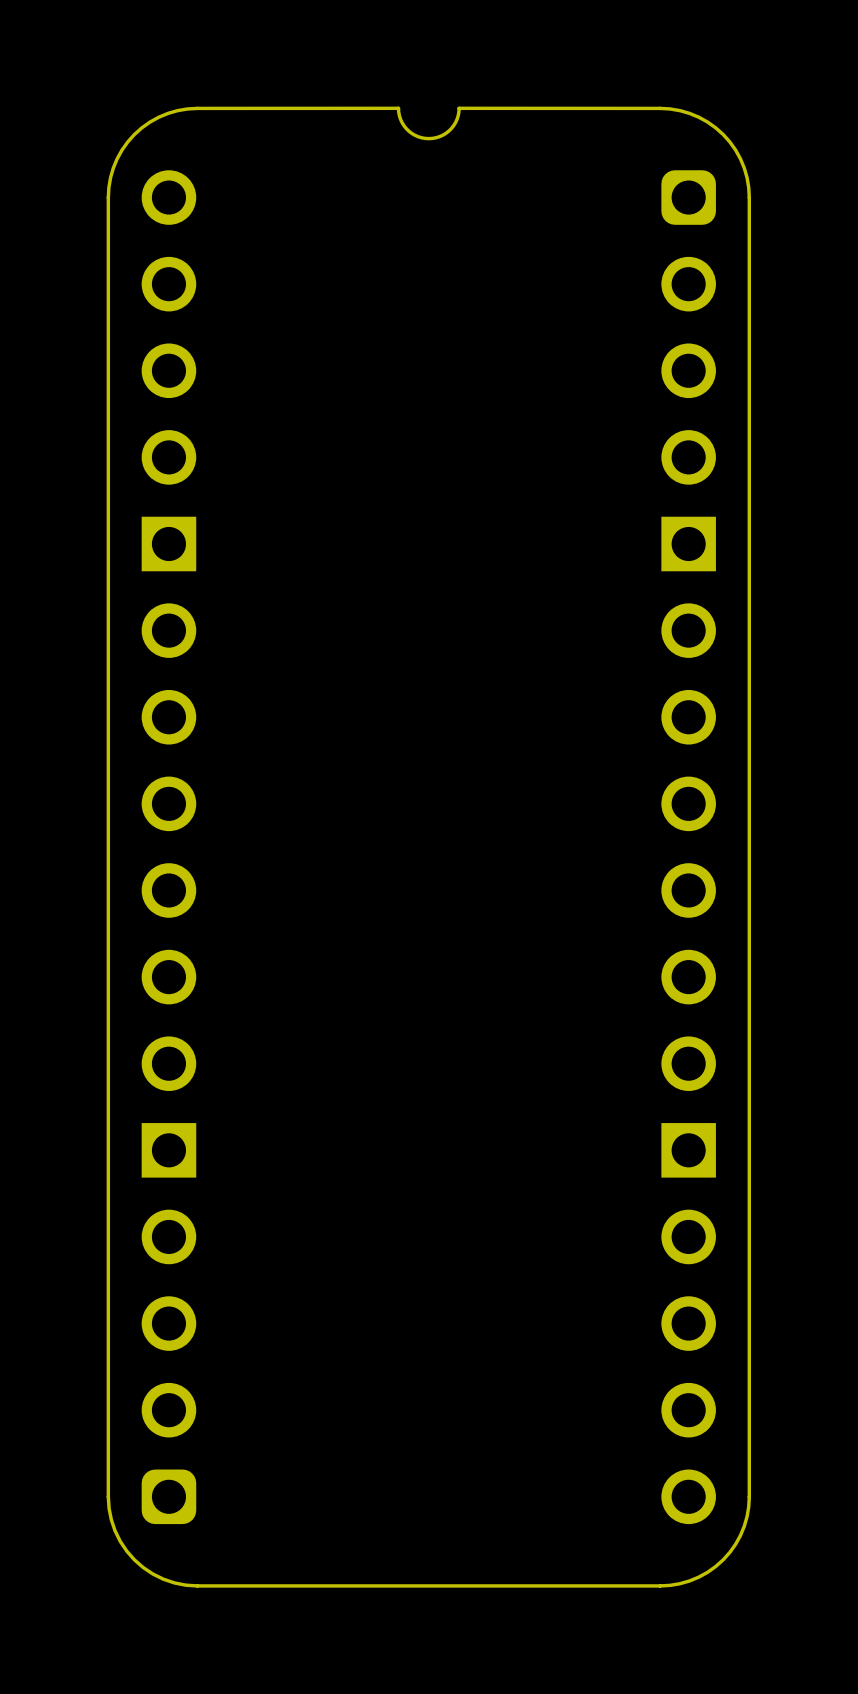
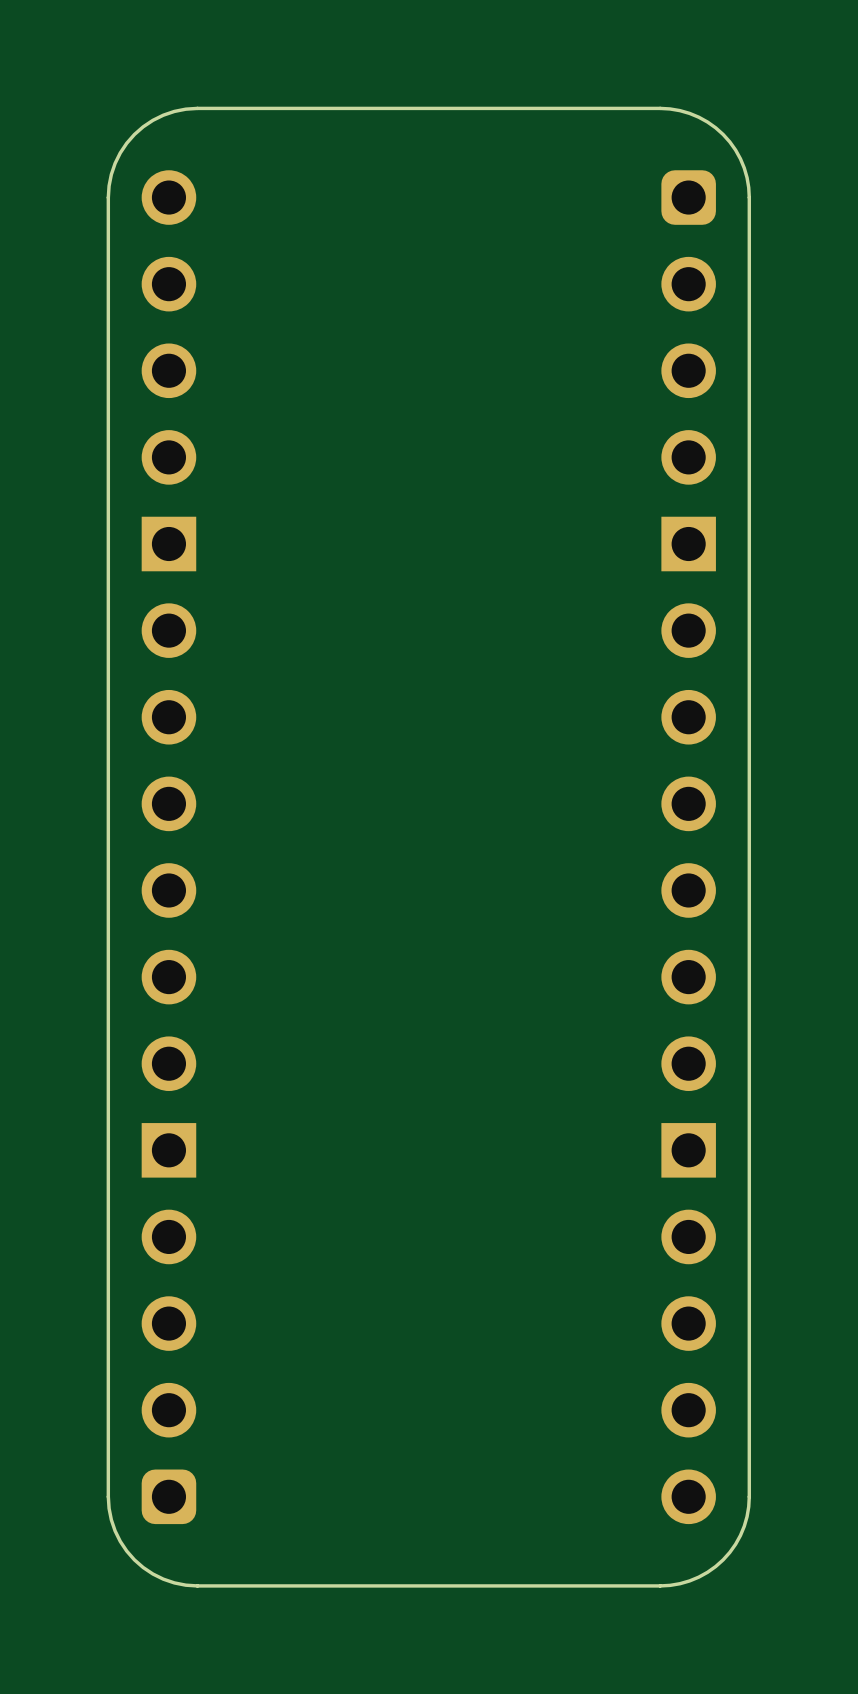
part footprint: [106, 106, 752, 1588] -> [106, 106, 752, 1588]

